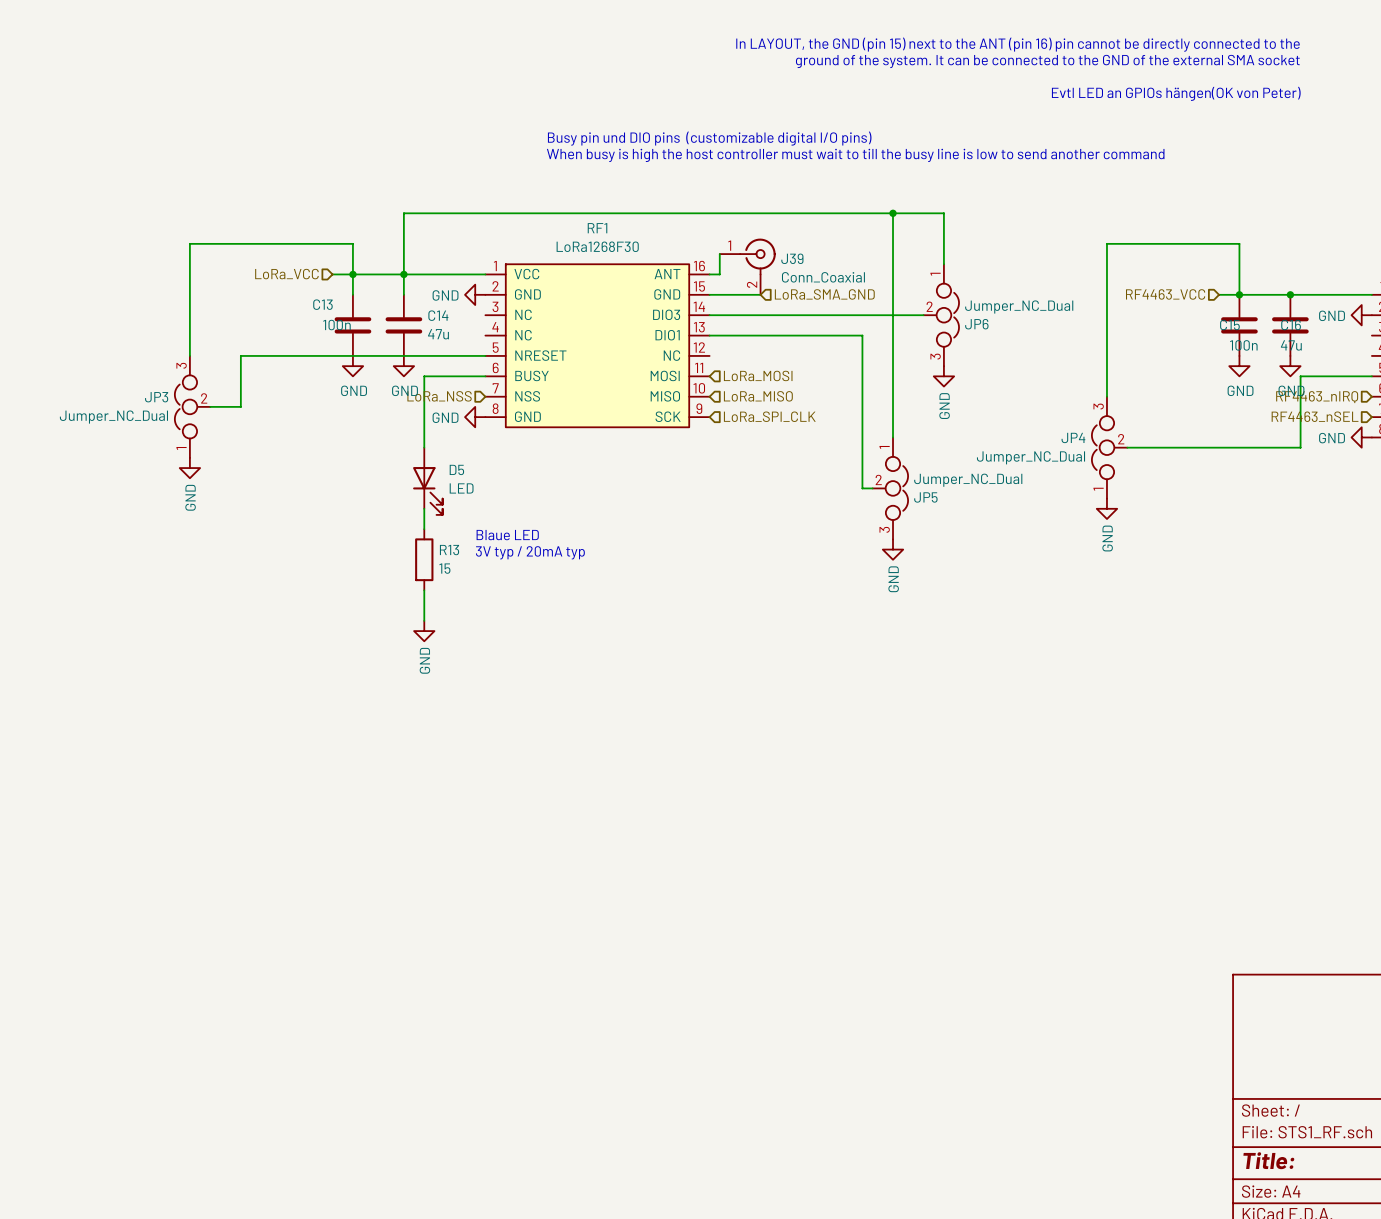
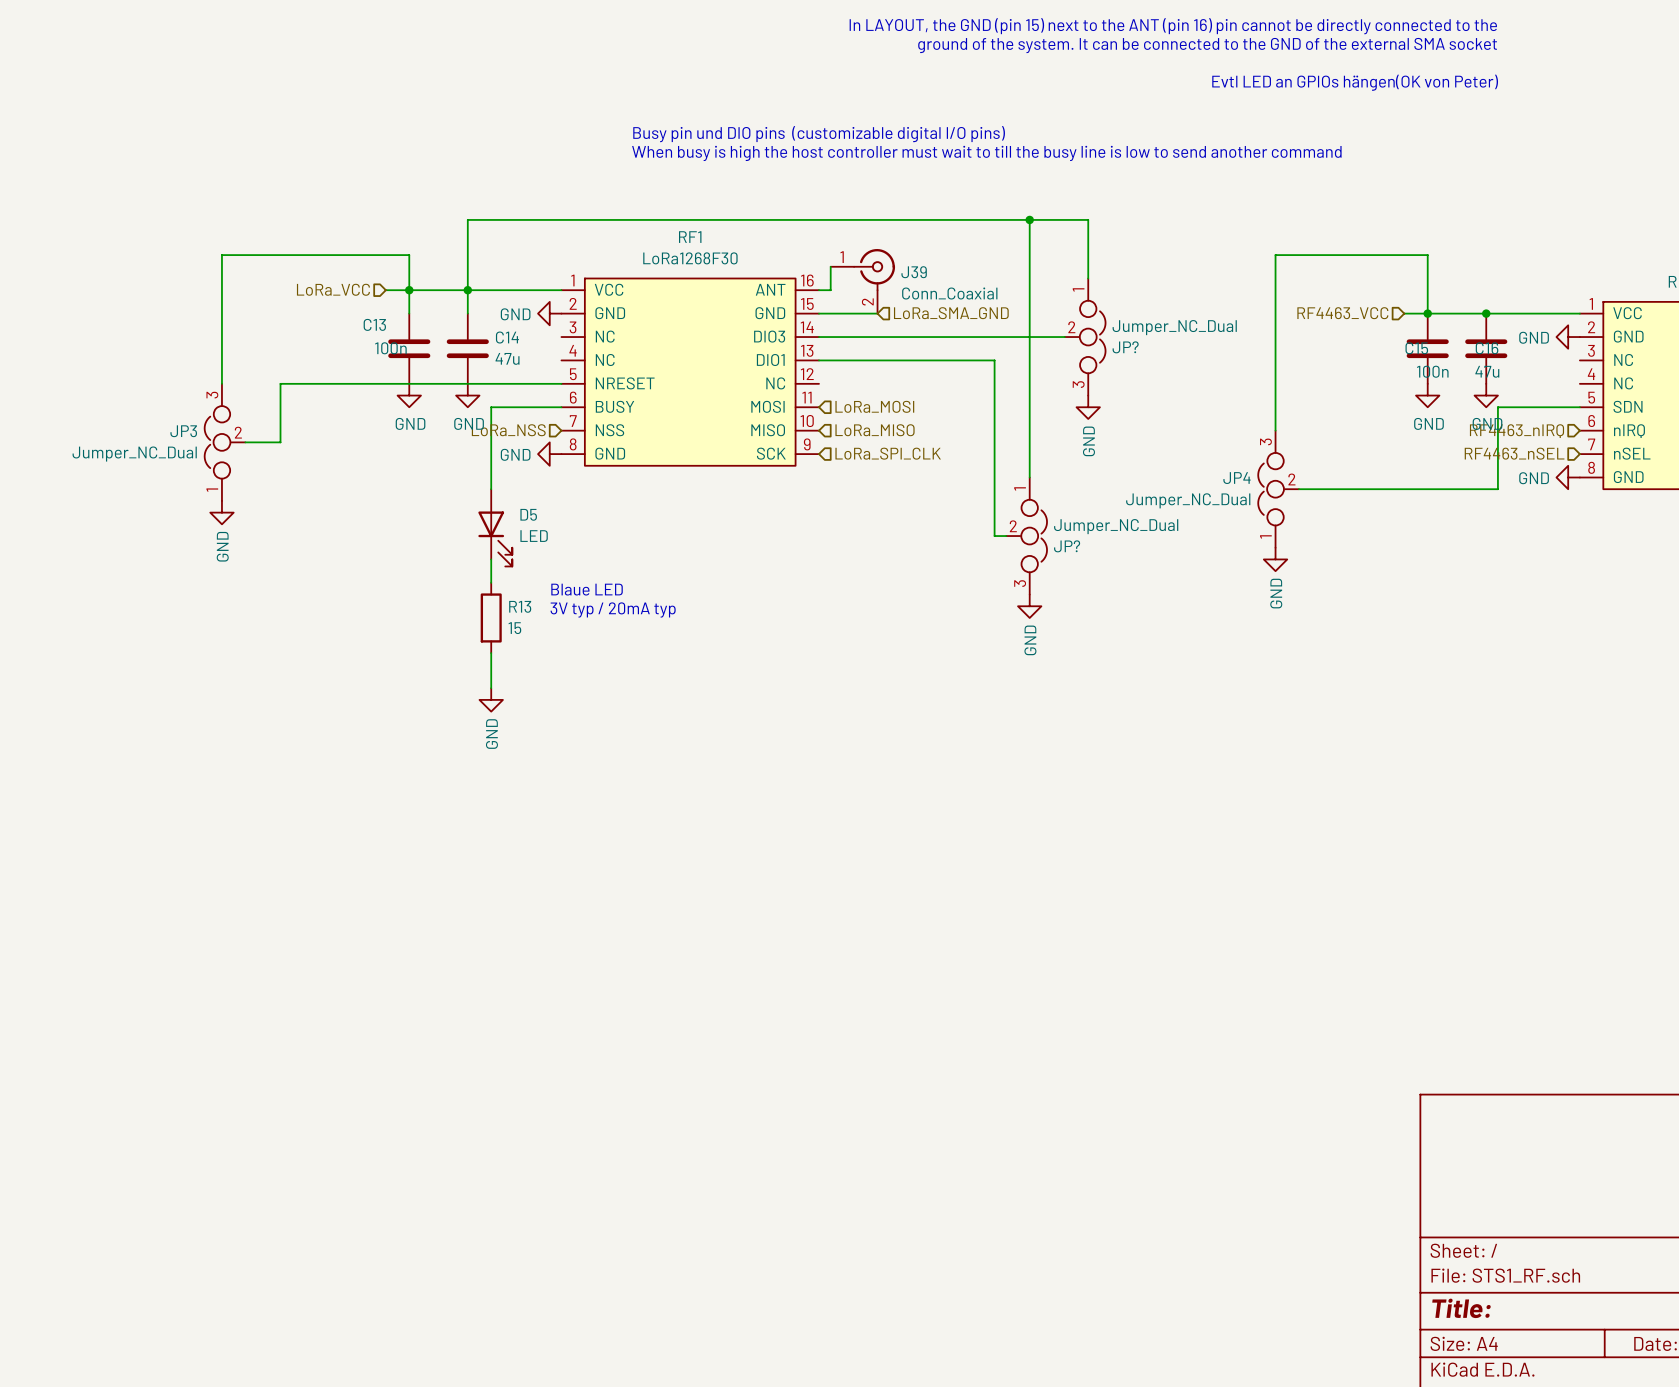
JP6 name: JP6 (976, 324) -> JP? (1125, 347)
JP5 name: JP5 (925, 497) -> JP? (1067, 546)

